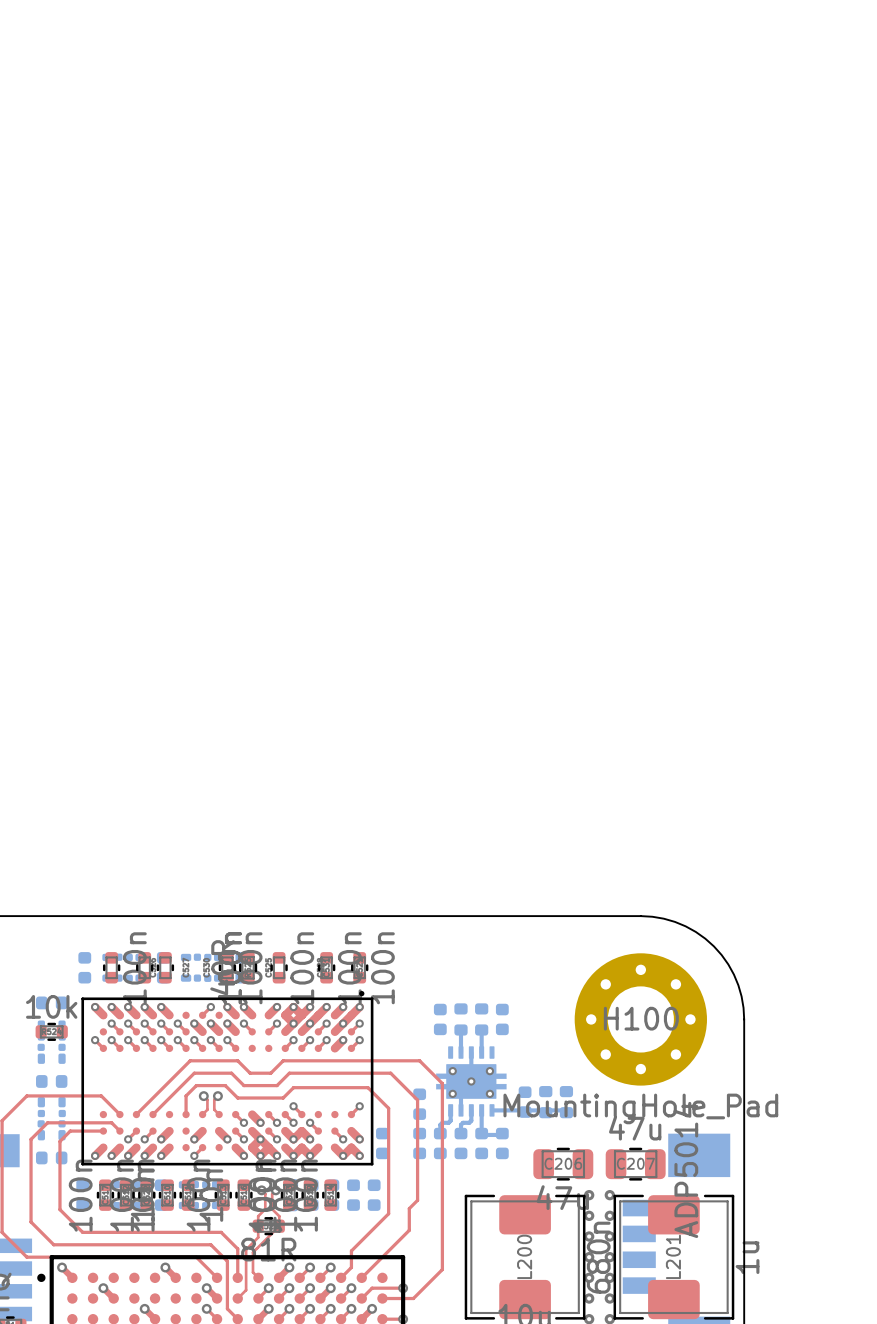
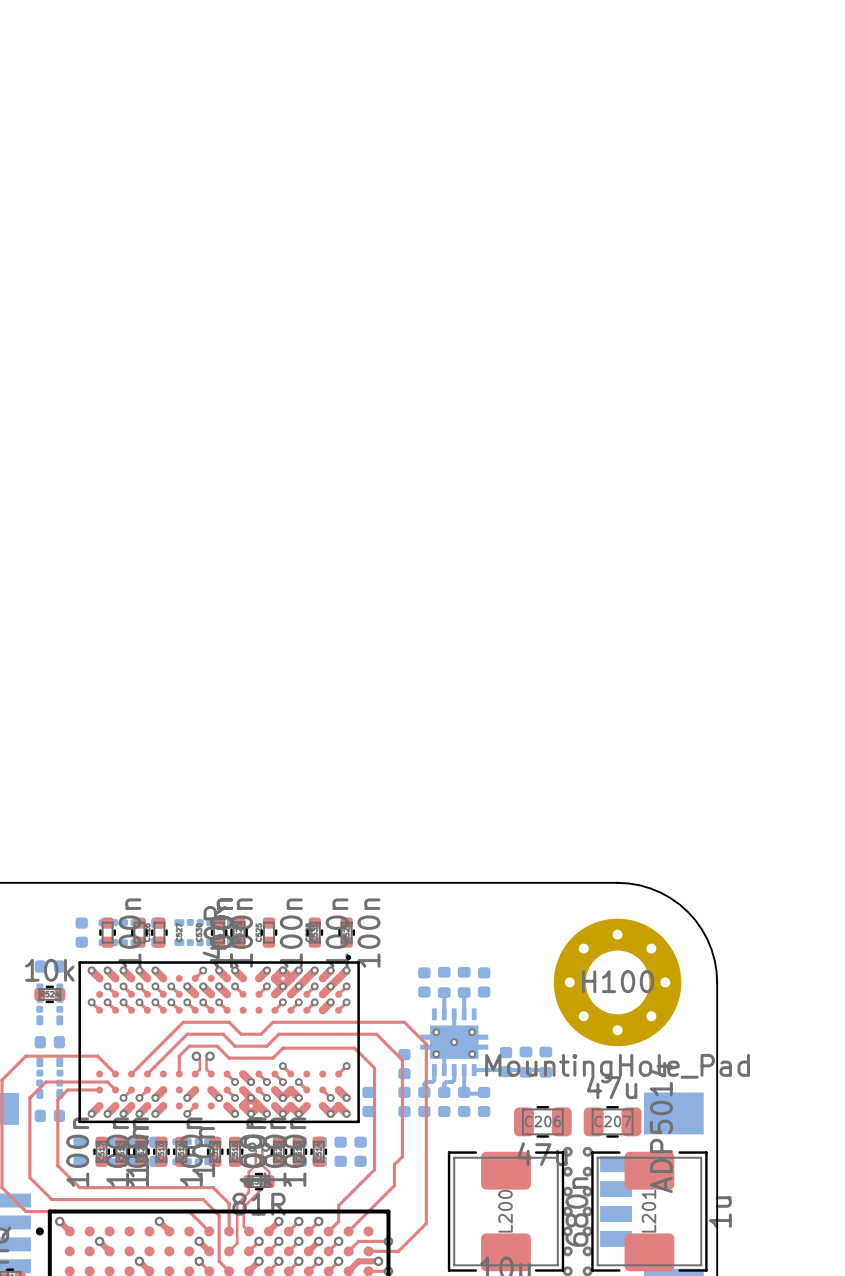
top track: none -> (358, 1261) (378, 1261)
via: (372, 1308) -> none
via: none -> (378, 1261)

